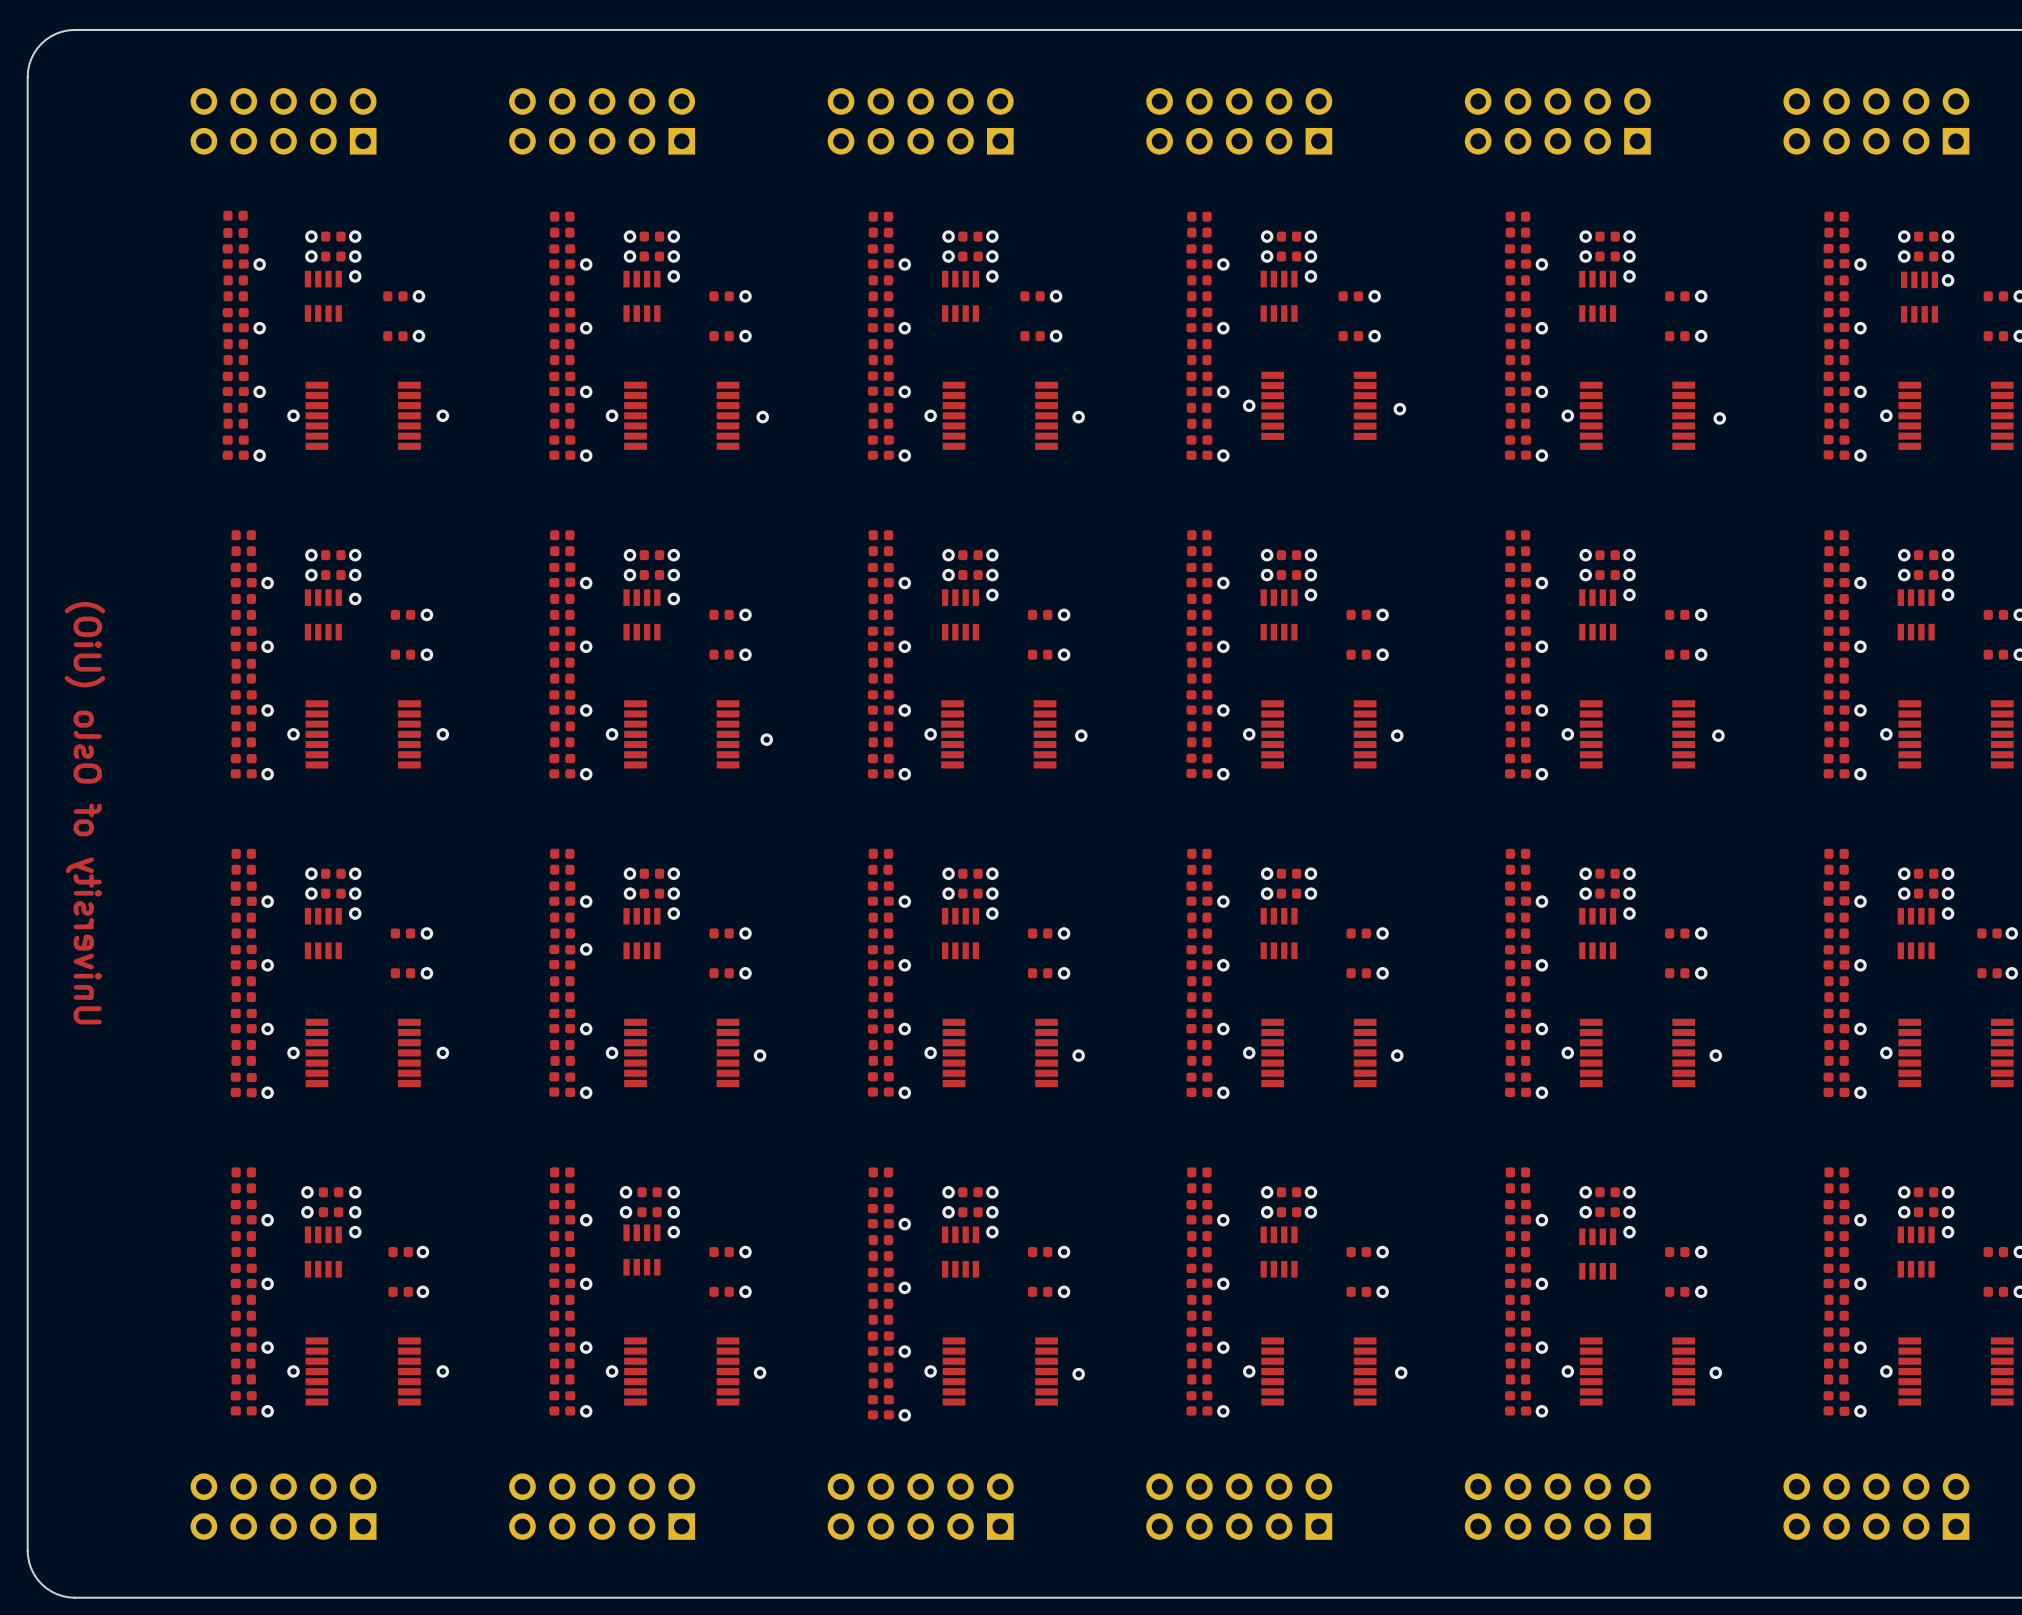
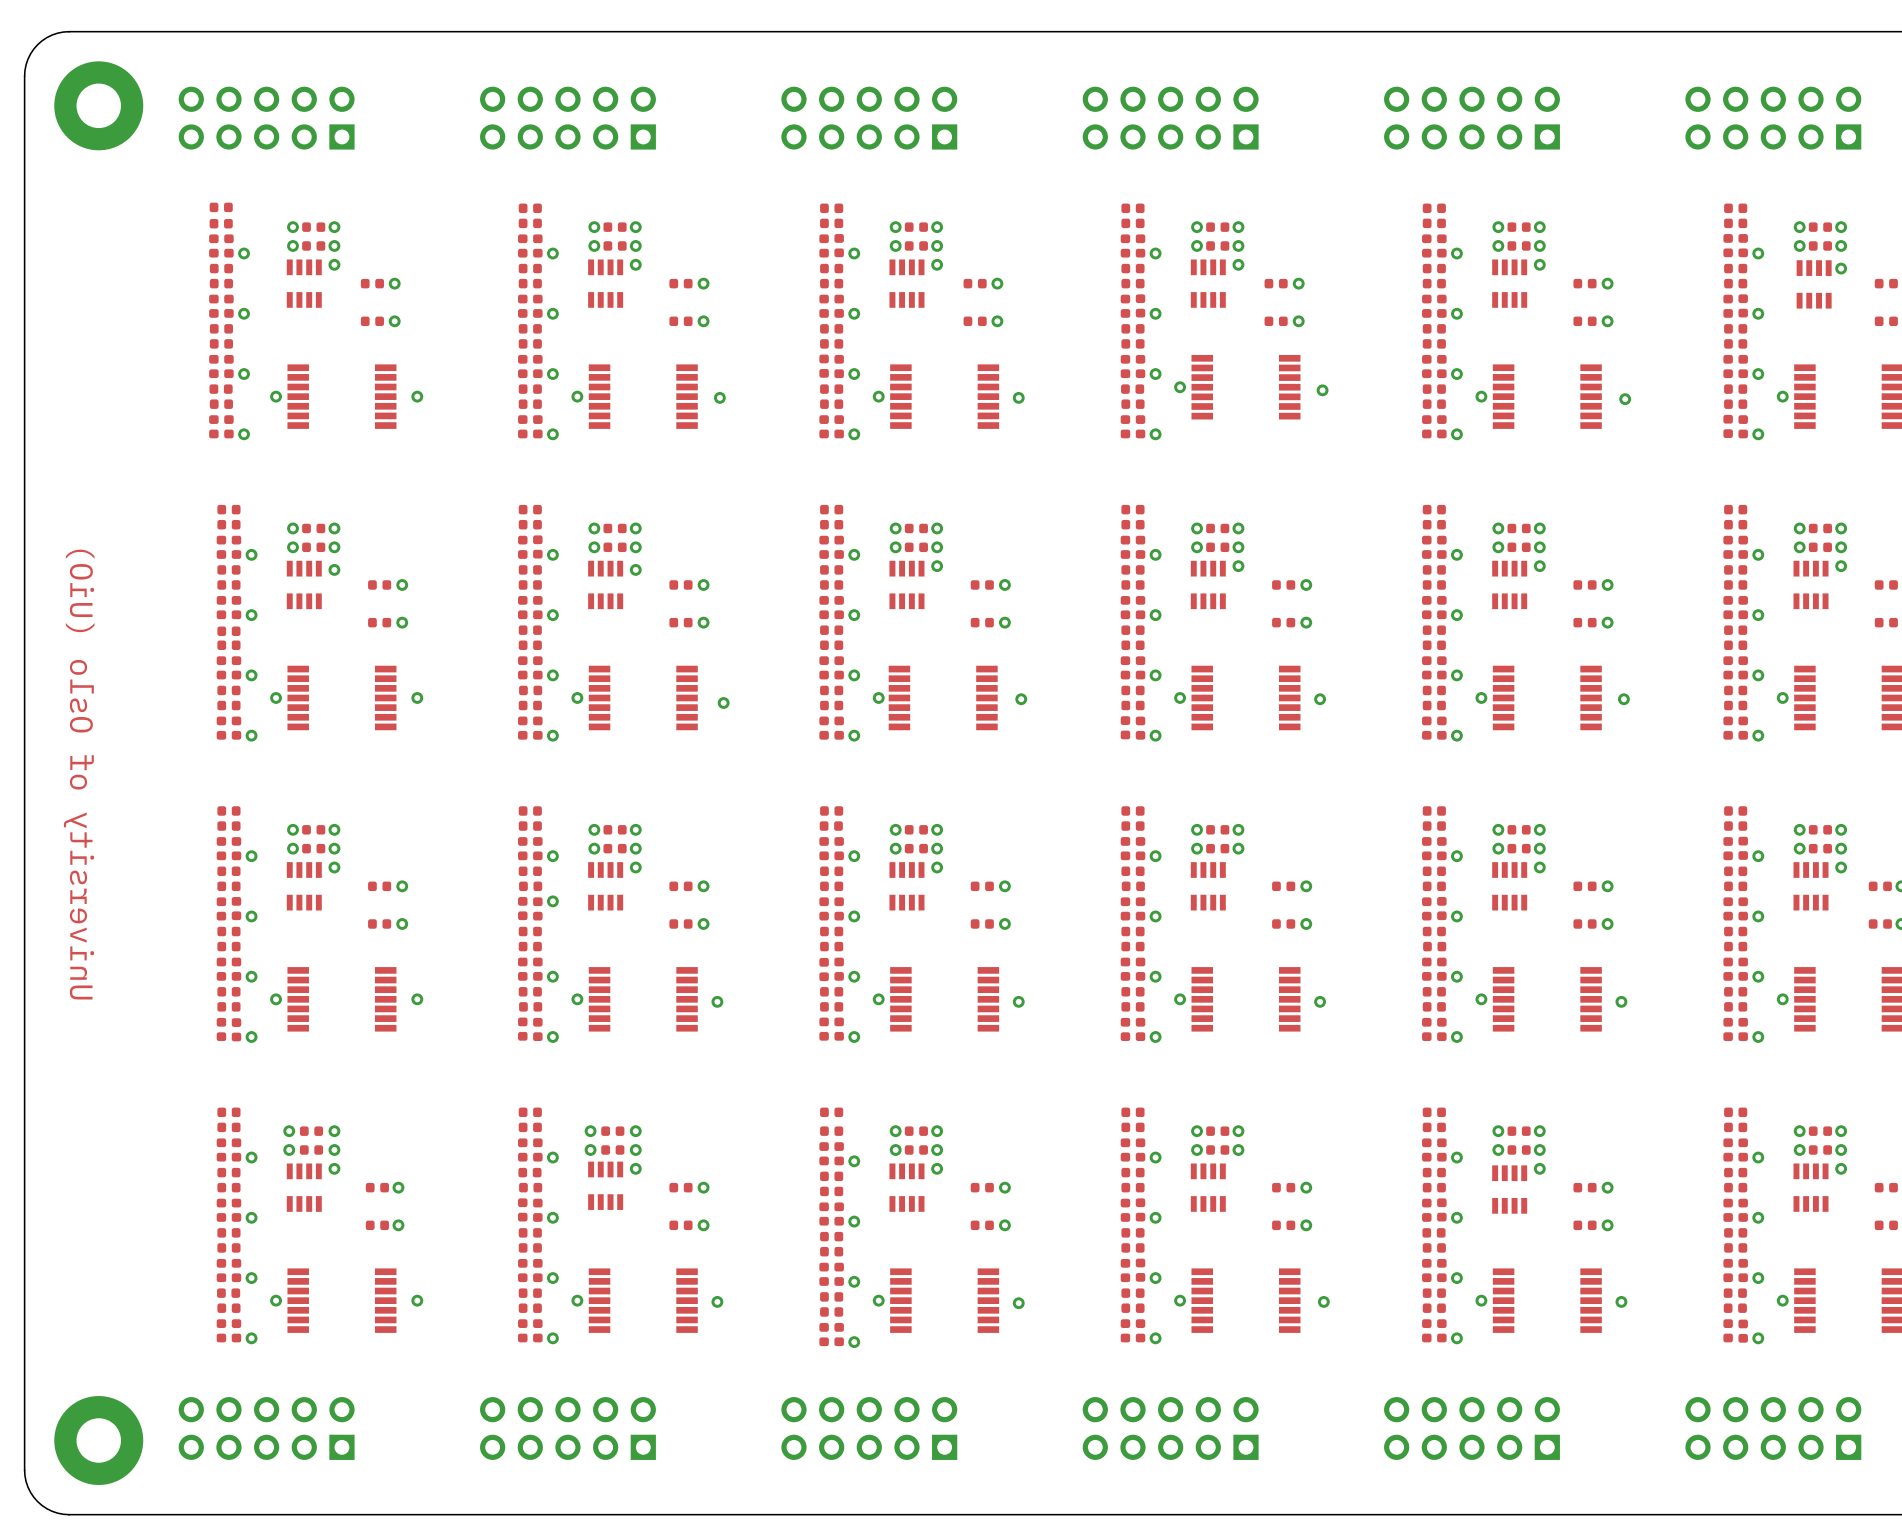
part: none -> (98, 105)
part: none -> (98, 1440)

